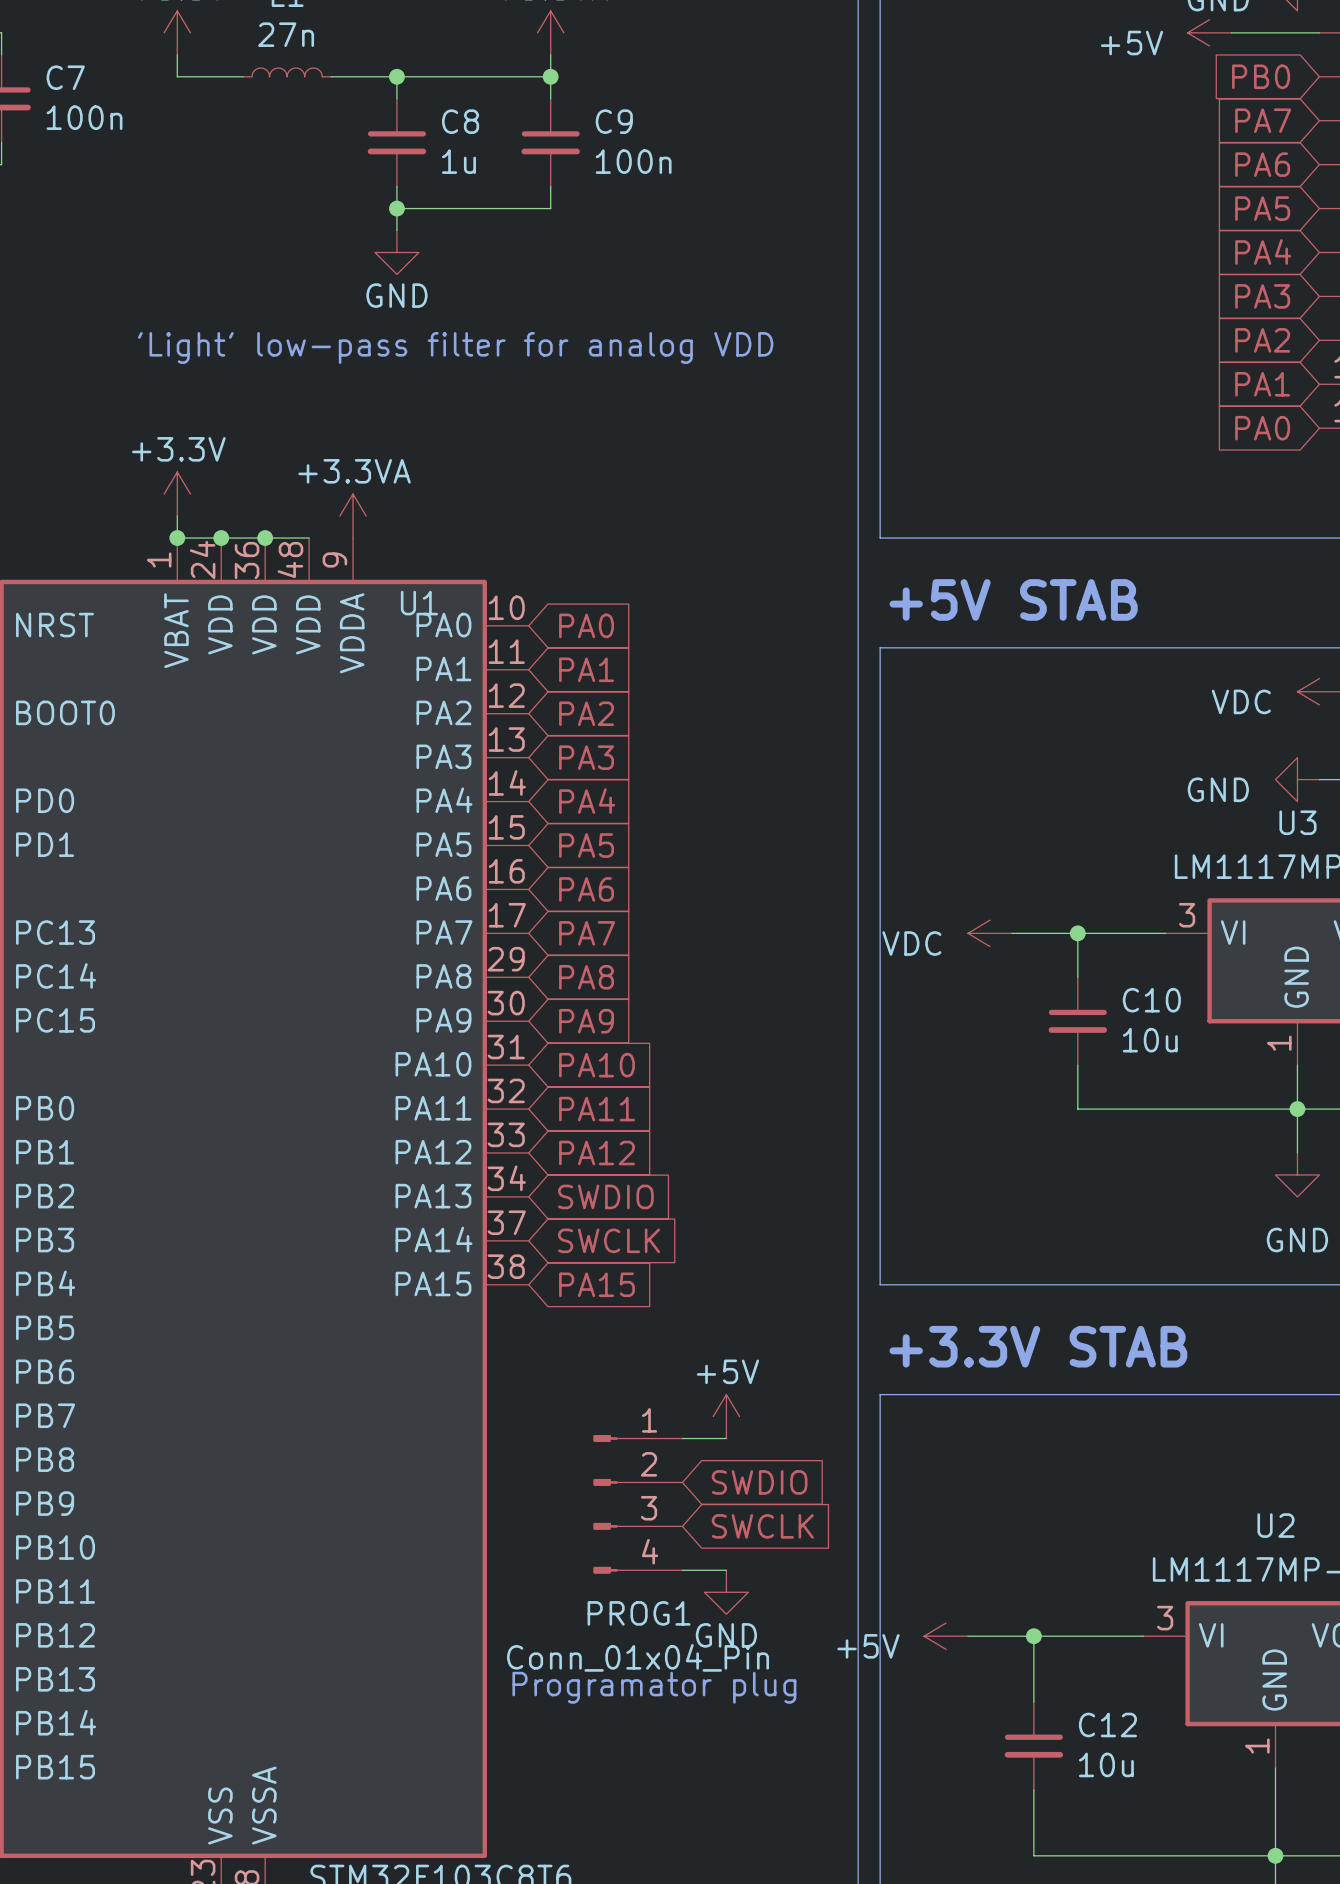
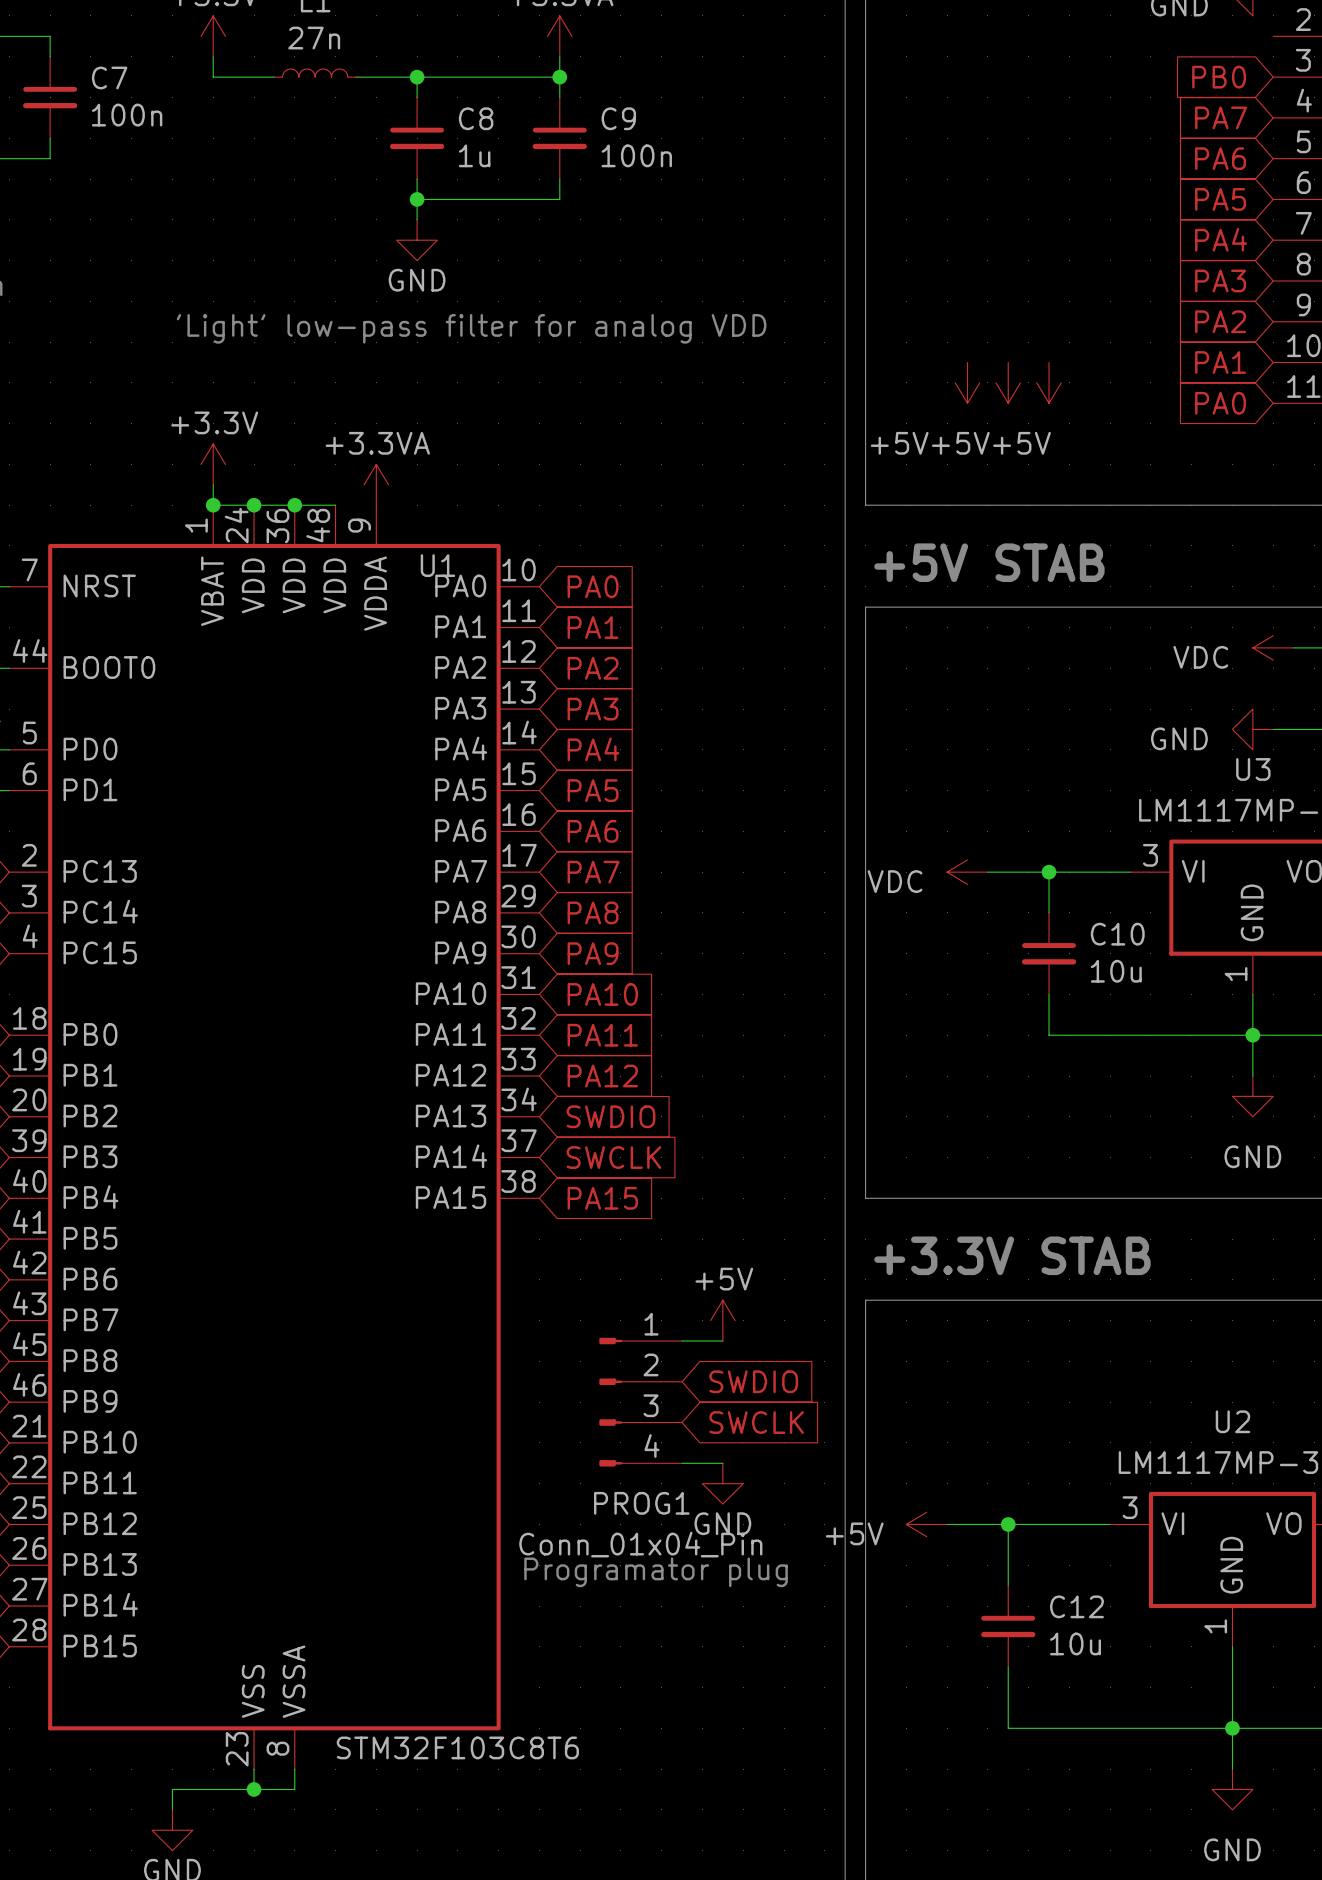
power symbol: +5V (1209, 32) -> none
wire: (1231, 32) (1319, 32) -> none
power symbol: none -> +5V (967, 382)
power symbol: none -> +5V (1008, 382)
power symbol: none -> +5V (1049, 382)

